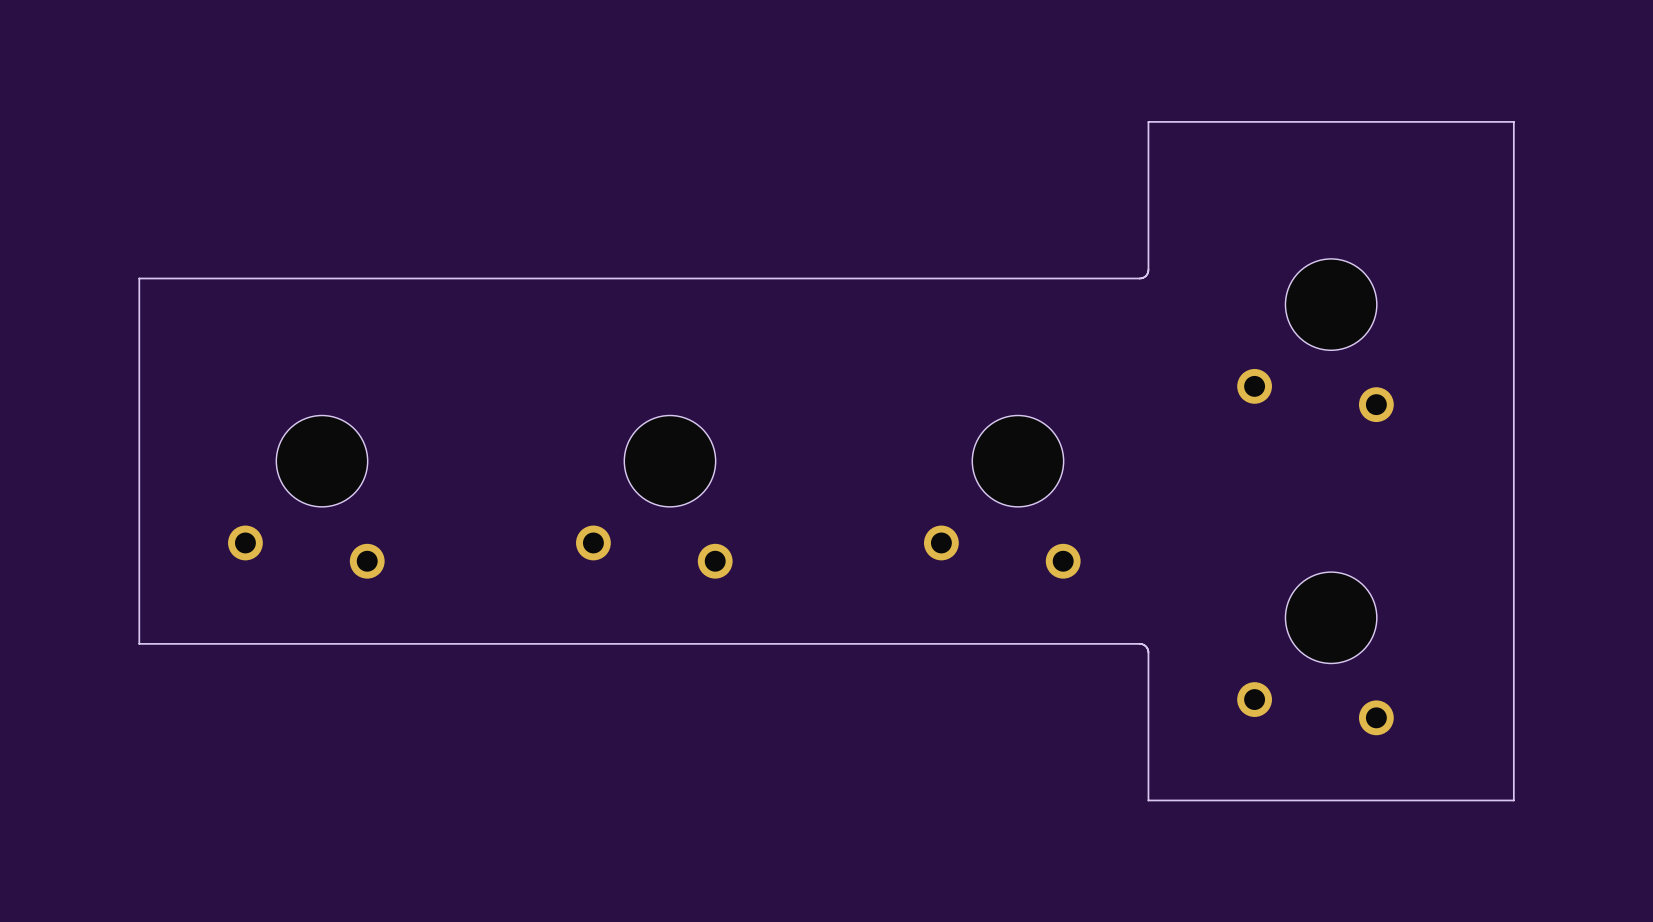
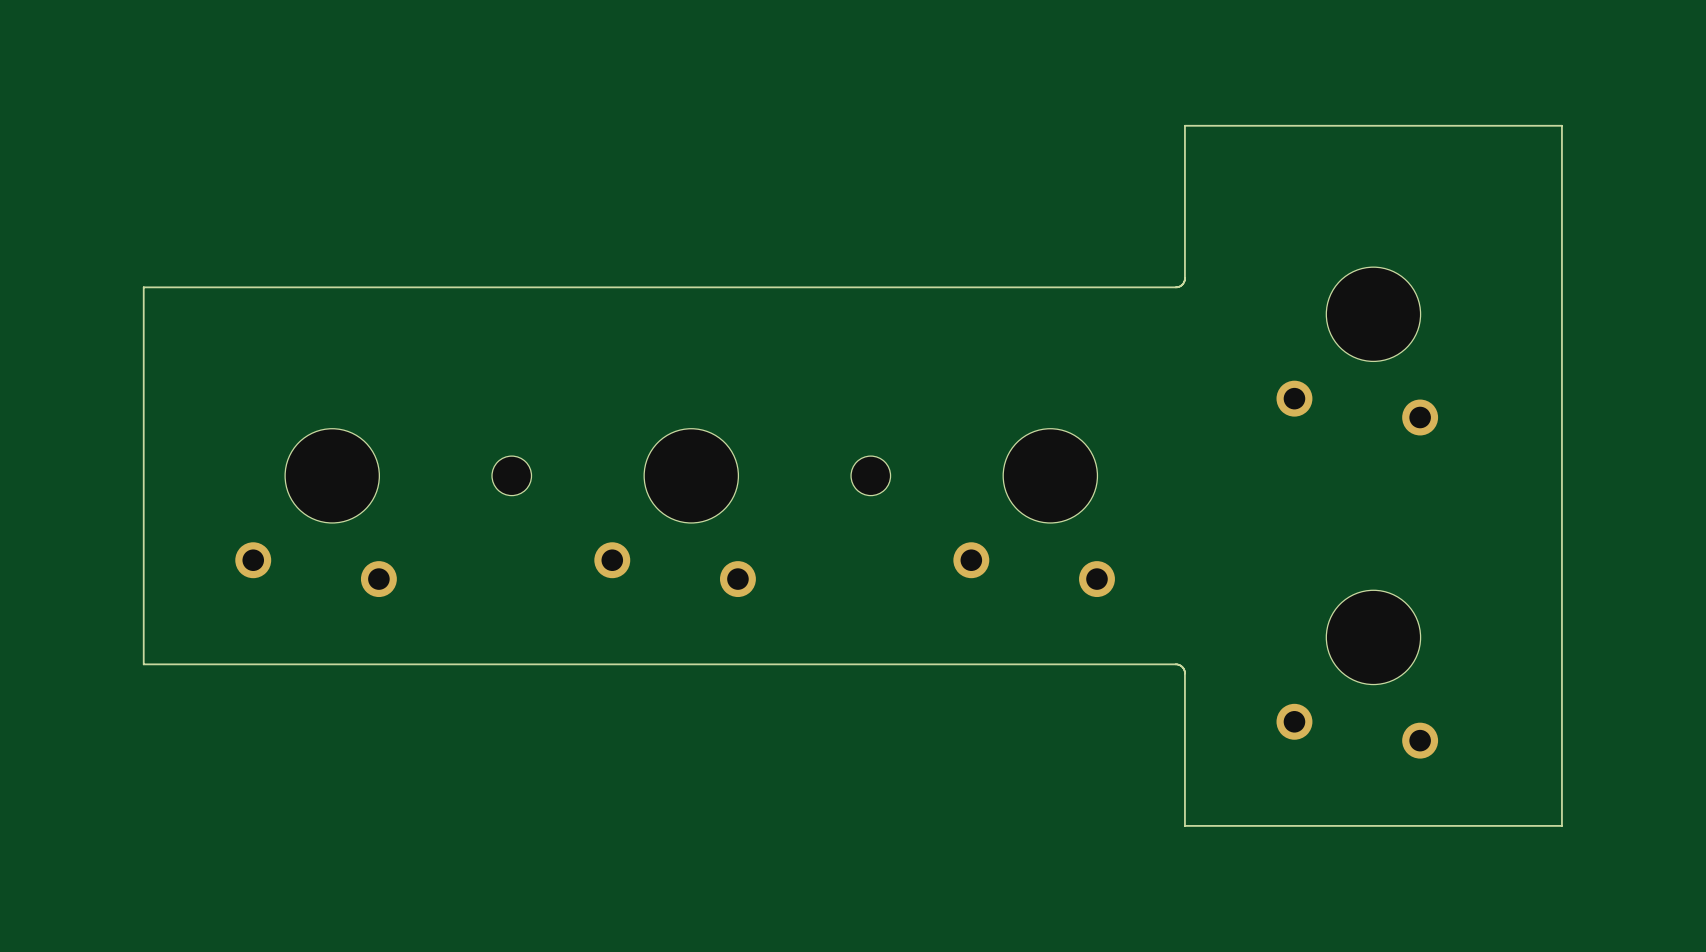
part: none -> (511, 475)
part: none -> (870, 475)

